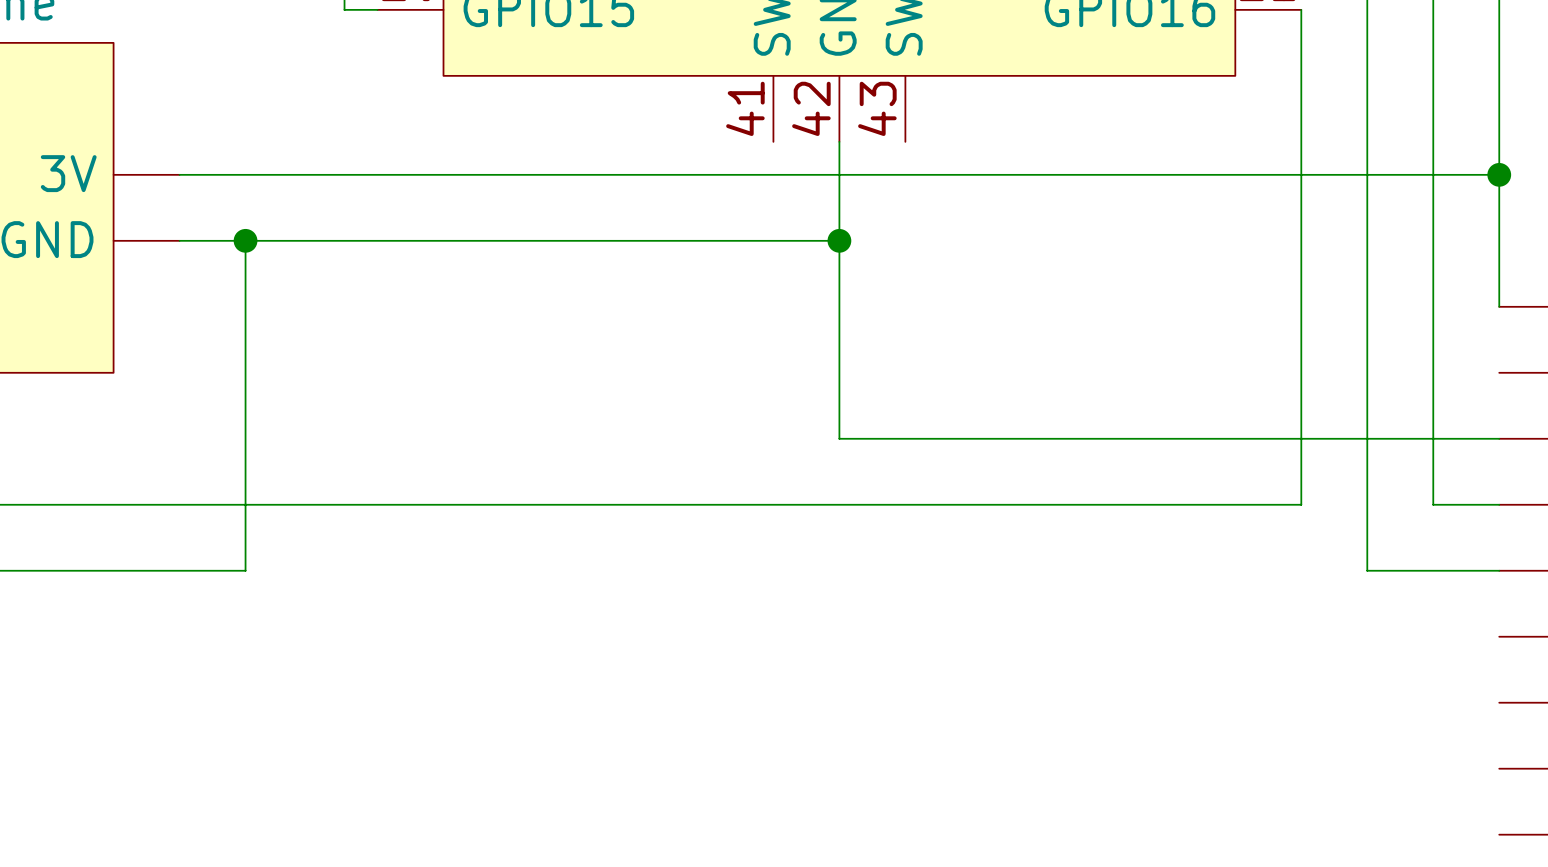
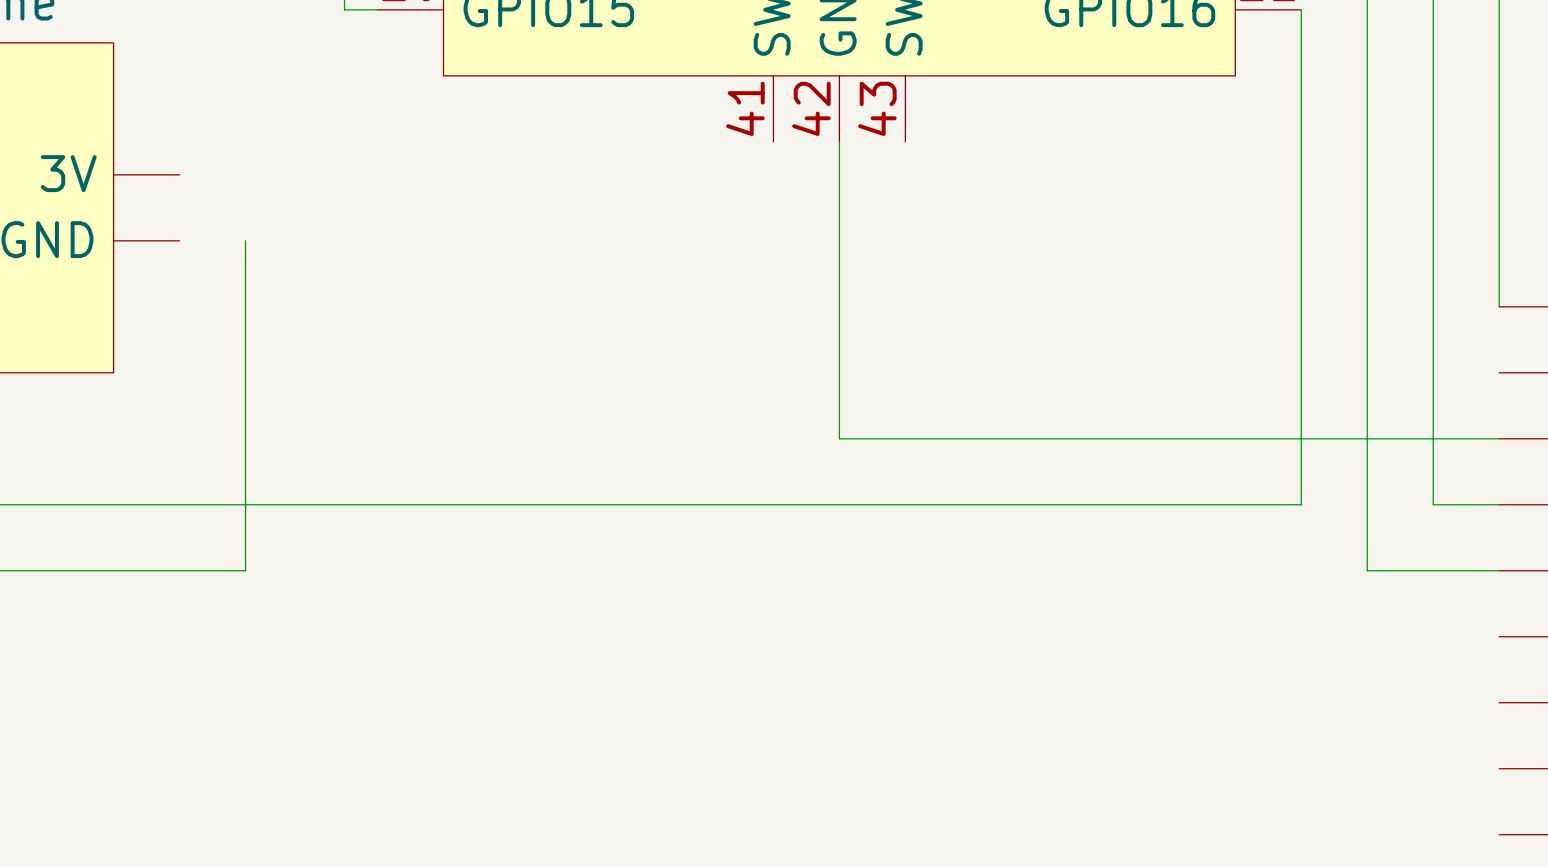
wire: (179, 174) (1499, 174) -> none
junction: (1499, 174) -> none
wire: (179, 240) (839, 240) -> none
junction: (245, 240) -> none
junction: (839, 240) -> none

